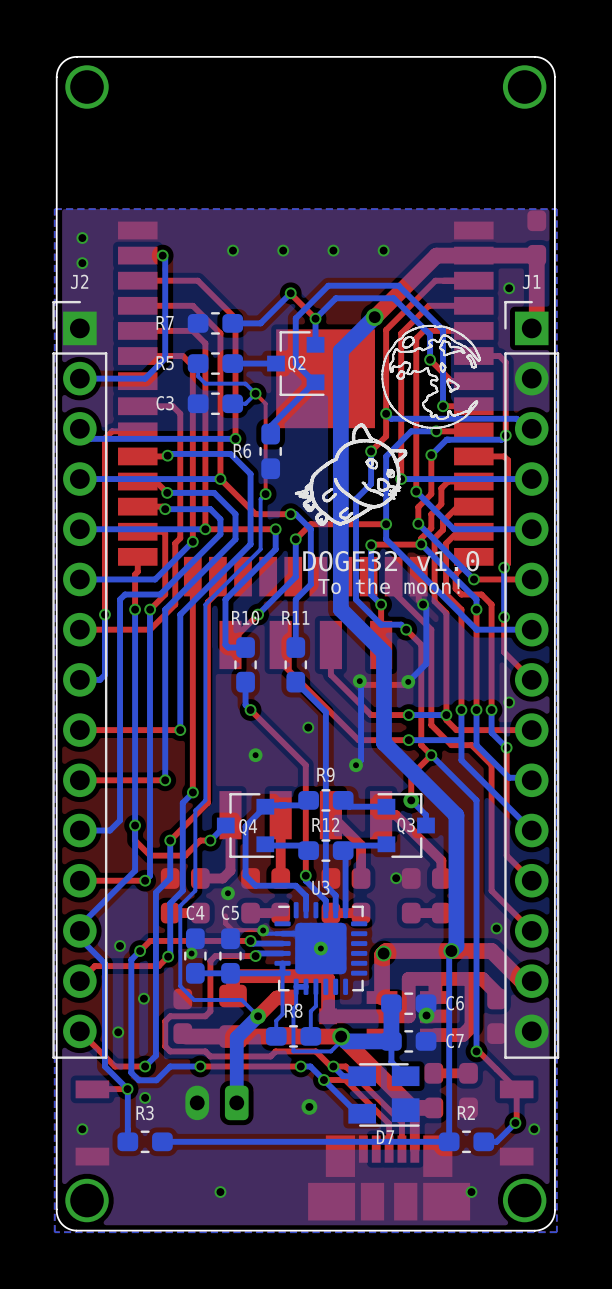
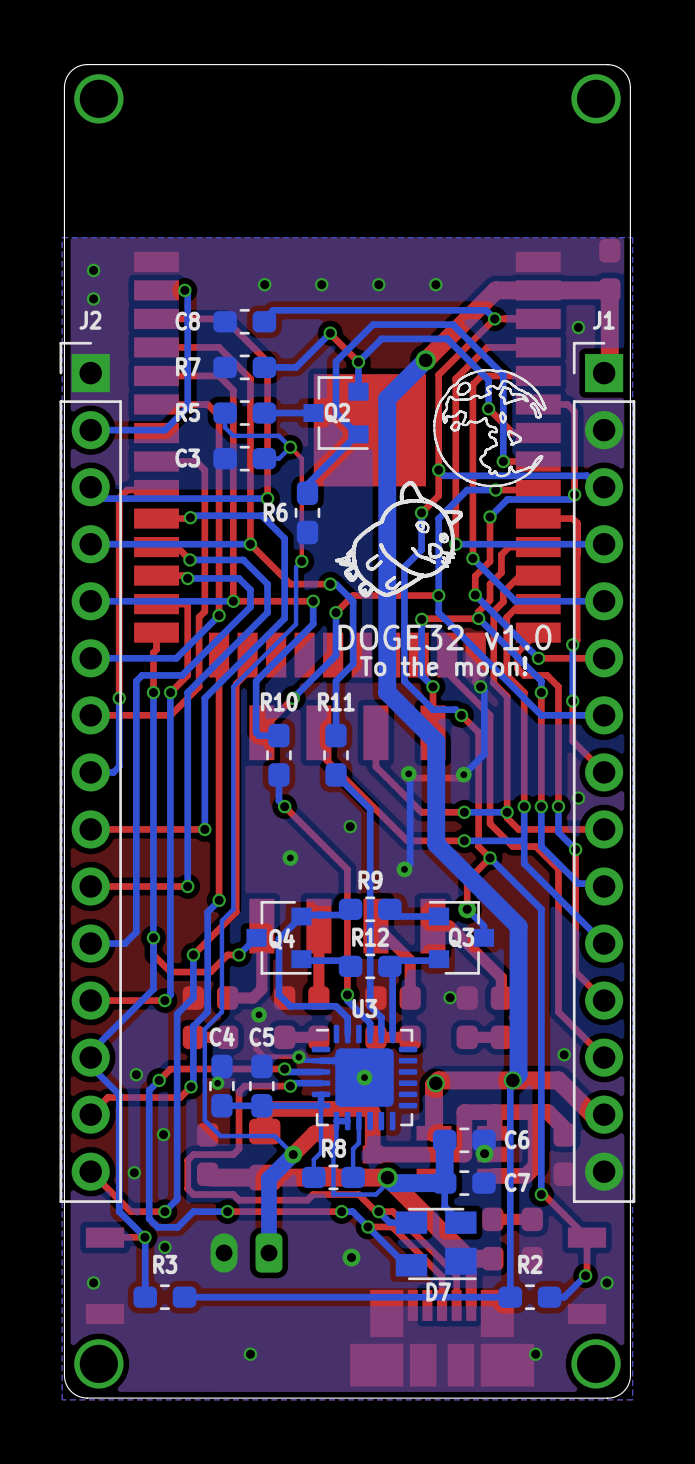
bottom track: none -> (494, 318) (486, 310) (273, 310) (264, 319) (264, 321)
via: none -> (494, 318)
C8: none -> (244, 321)

